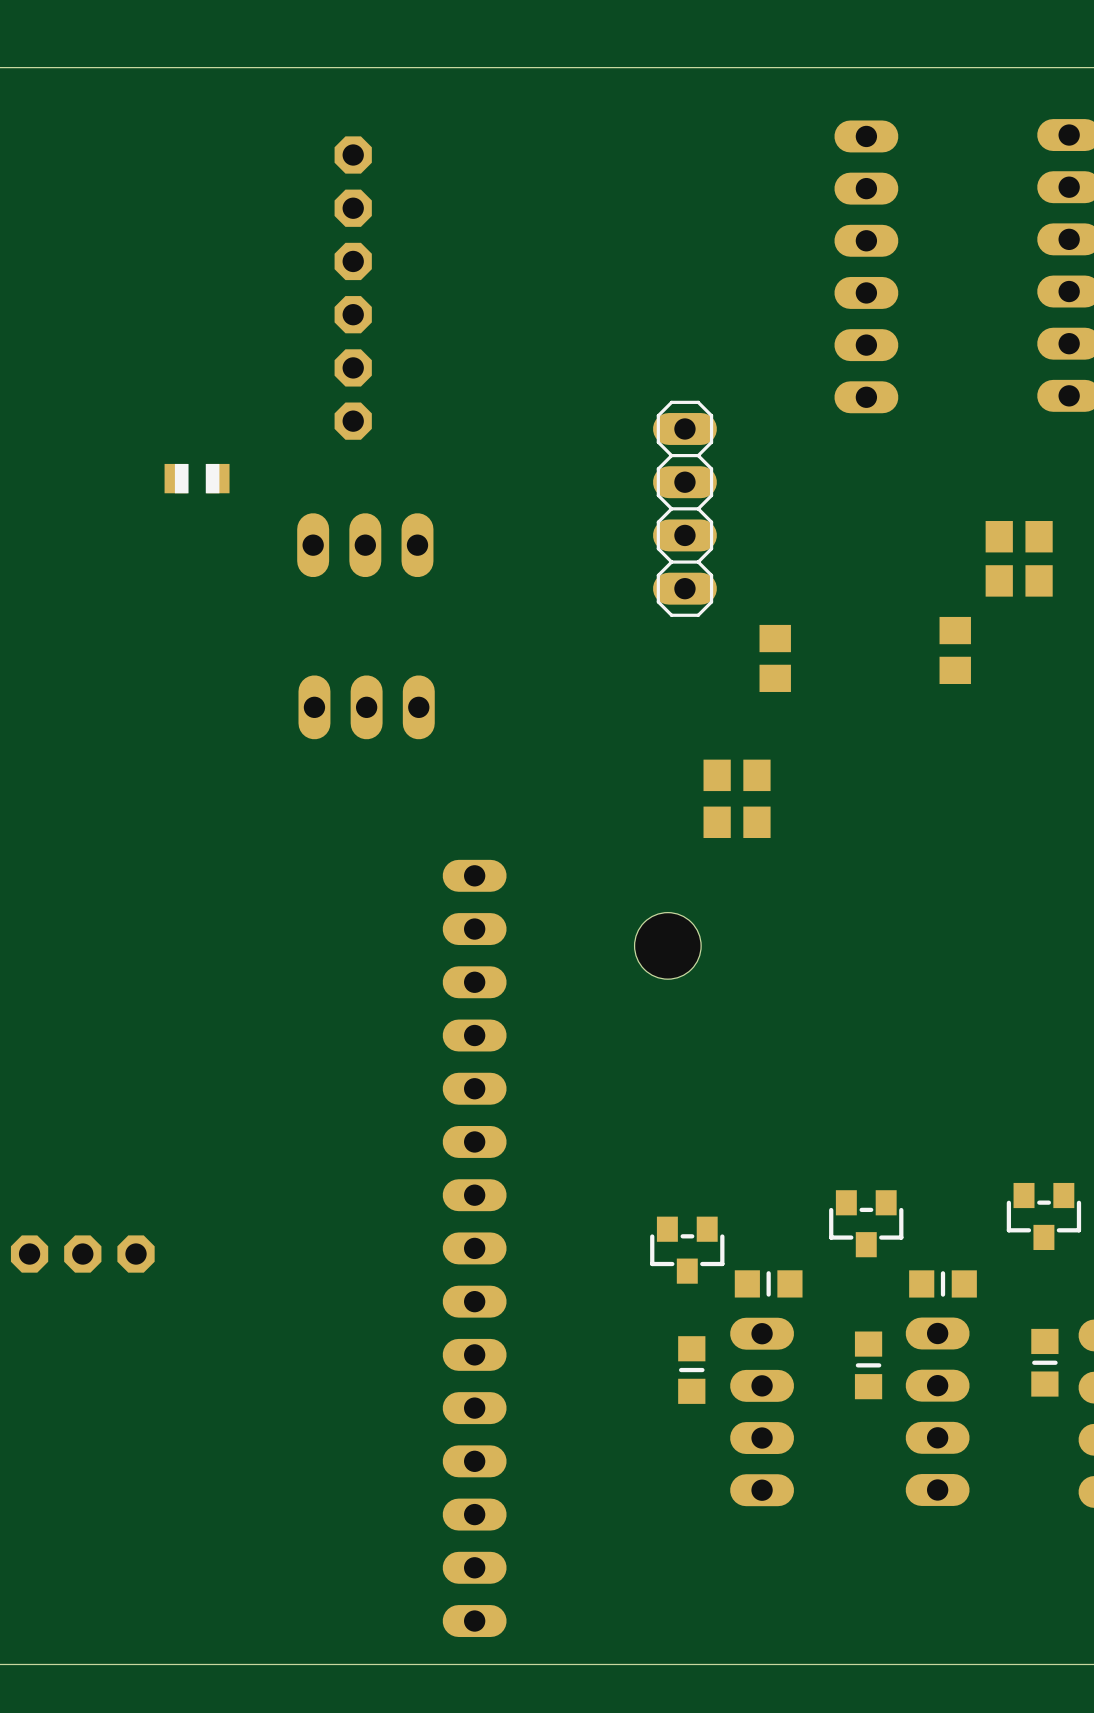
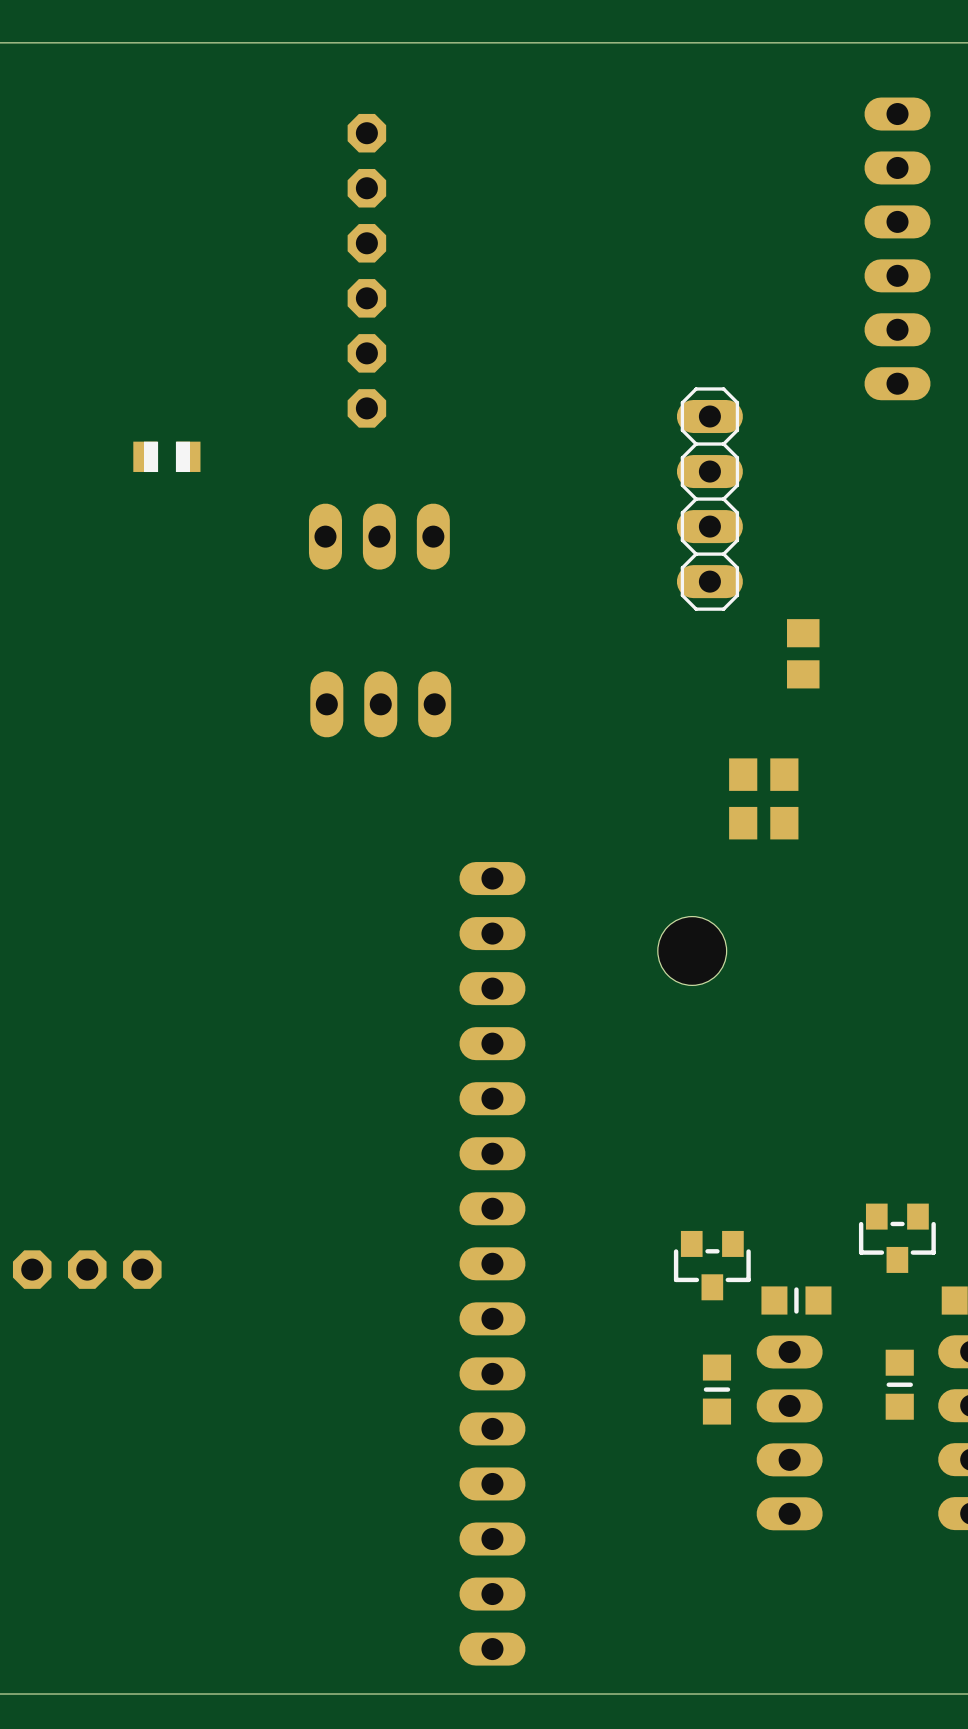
part position: (197, 478) -> (166, 456)

